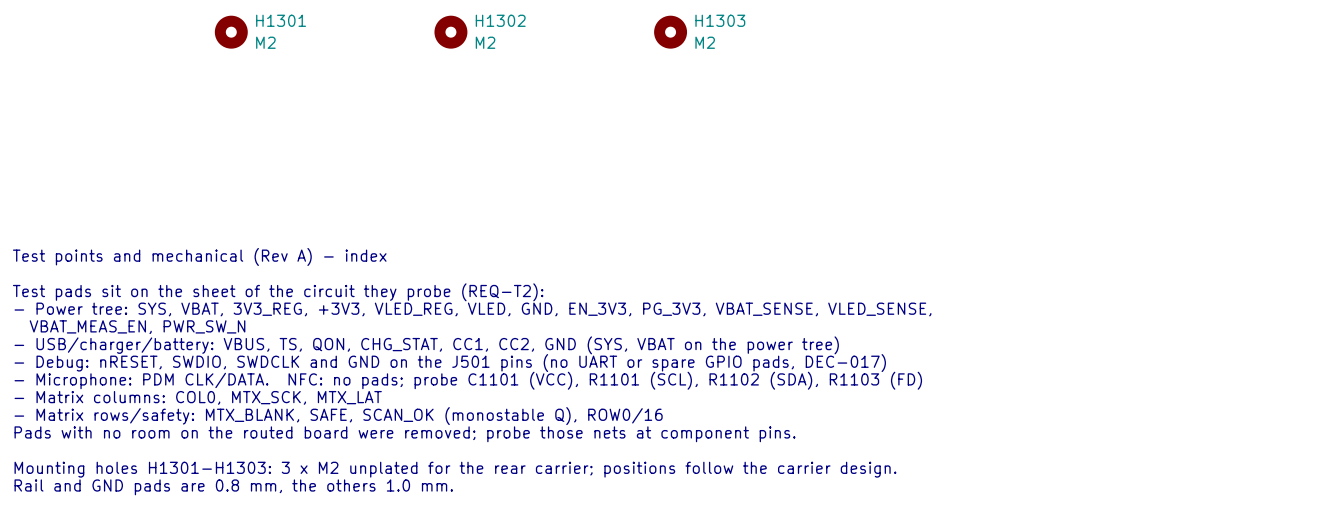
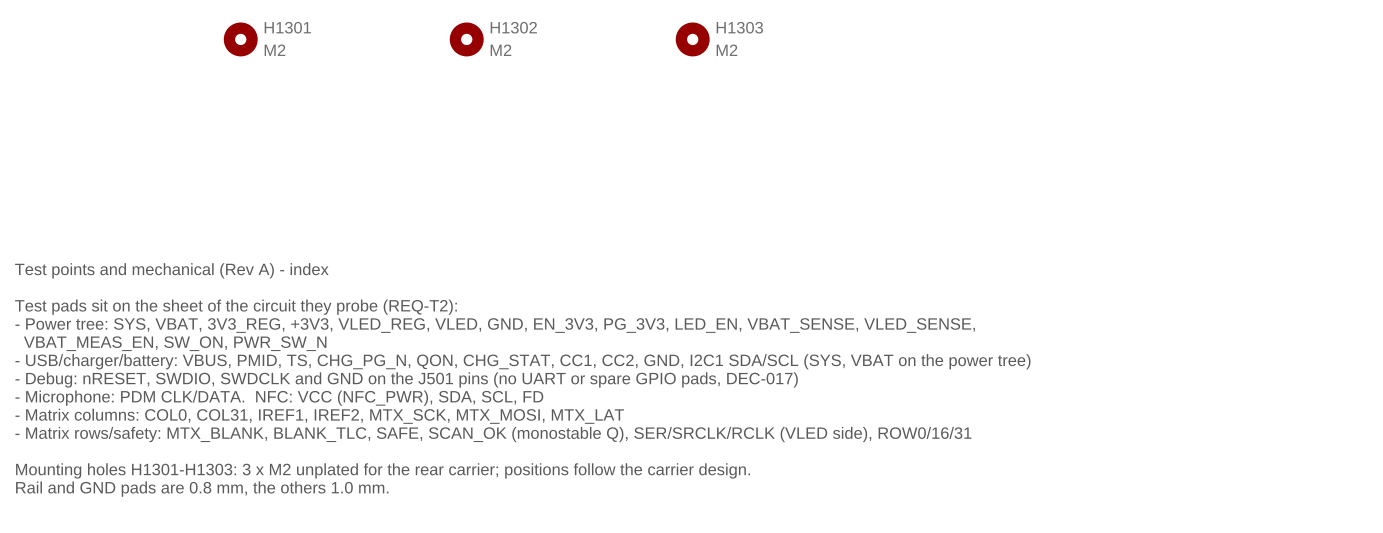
text: - Power tree: SYS, VBAT, 3V3_REG, +3V3, VLED_REG, VLED, GND, EN_3V3, PG_3V3, VBAT_SENSE, VLED_SENSE, (472, 309) -> - Power tree: SYS, VBAT, 3V3_REG, +3V3, VLED_REG, VLED, GND, EN_3V3, PG_3V3, LED_EN, VBAT_SENSE, VLED_SENSE, (495, 325)
text: VBAT_MEAS_EN, PWR_SW_N (137, 327) -> VBAT_MEAS_EN, SW_ON, PWR_SW_N (175, 343)
text: - USB/charger/battery: VBUS, TS, QON, CHG_STAT, CC1, CC2, GND (SYS, VBAT on the power tree) (426, 345) -> - USB/charger/battery: VBUS, PMID, TS, CHG_PG_N, QON, CHG_STAT, CC1, CC2, GND, I2C1 SDA/SCL (SYS, VBAT on the power tree) (522, 361)
text: - Microphone: PDM CLK/DATA. NFC: no pads; probe C1101 (VCC), R1101 (SCL), R1102 (SDA), R1103 (FD) (468, 380) -> - Microphone: PDM CLK/DATA. NFC: VCC (NFC_PWR), SDA, SCL, FD (279, 398)
text: - Matrix columns: COL0, MTX_SCK, MTX_LAT (198, 397) -> - Matrix columns: COL0, COL31, IREF1, IREF2, MTX_SCK, MTX_MOSI, MTX_LAT (319, 416)
text: - Matrix rows/safety: MTX_BLANK, SAFE, SCAN_OK (monostable Q), ROW0/16 (338, 416) -> - Matrix rows/safety: MTX_BLANK, BLANK_TLC, SAFE, SCAN_OK (monostable Q), SER/SRCLK/RCLK (VLED side), ROW0/16/31 (493, 434)
text: Pads with no room on the routed board were removed; probe those nets at component pins. (405, 434) -> none
text: none -> Mounting holes H1301-H1303: 3 x M2 unplated for the rear carrier; positions follow the carrier design. (383, 470)
text: Mounting holes H1301-H1303: 3 x M2 unplated for the rear carrier; positions follow the carrier design. (455, 469) -> Rail and GND pads are 0.8 mm, the others 1.0 mm. (202, 489)
text: Rail and GND pads are 0.8 mm, the others 1.0 mm. (233, 487) -> none

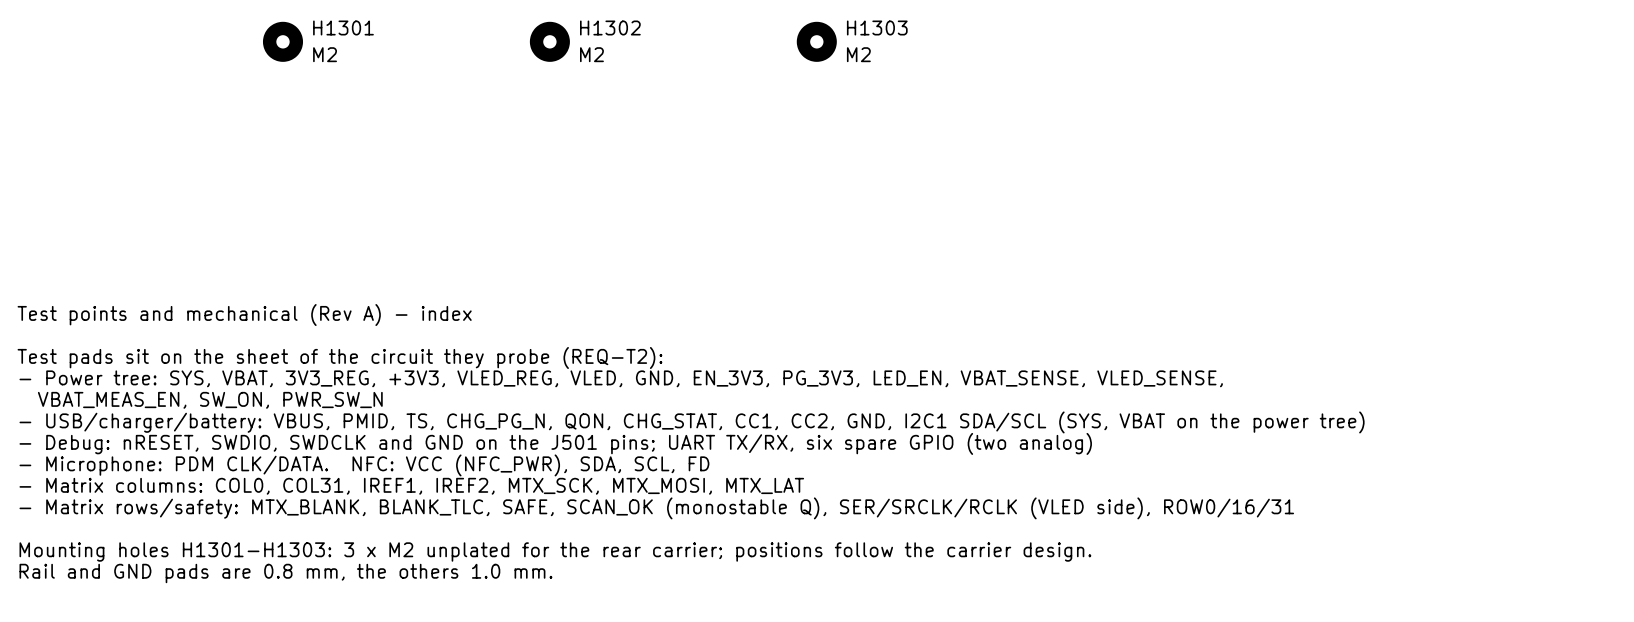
text: - Debug: nRESET, SWDIO, SWDCLK and GND on the J501 pins (no UART or spare GPIO pads, DEC-017) (406, 379) -> - Debug: nRESET, SWDIO, SWDCLK and GND on the J501 pins; UART TX/RX, six spare GPIO (two analog) (555, 443)

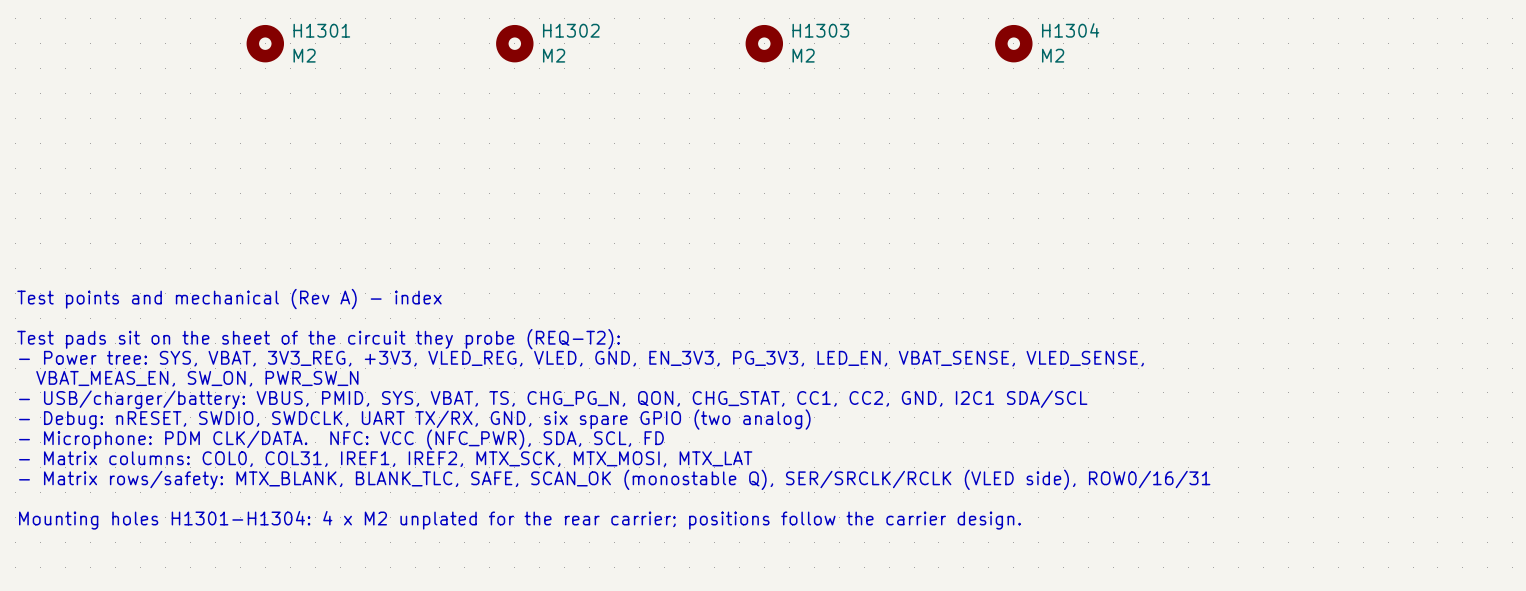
H1304: none -> M2 (1013, 43)
text: - USB/charger/battery: VBUS, PMID, TS, CHG_PG_N, QON, CHG_STAT, CC1, CC2, GND, I2C1 SDA/SCL (SYS, VBAT on the power tree) (692, 422) -> - USB/charger/battery: VBUS, PMID, SYS, VBAT, TS, CHG_PG_N, QON, CHG_STAT, CC1, CC2, GND, I2C1 SDA/SCL (553, 399)
text: - Debug: nRESET, SWDIO, SWDCLK and GND on the J501 pins; UART TX/RX, six spare GPIO (two analog) (555, 443) -> - Debug: nRESET, SWDIO, SWDCLK, UART TX/RX, GND, six spare GPIO (two analog) (414, 419)
text: Mounting holes H1301-H1303: 3 x M2 unplated for the rear carrier; positions follow the carrier design. (555, 552) -> Mounting holes H1301-H1304: 4 x M2 unplated for the rear carrier; positions follow the carrier design. (519, 520)
text: Rail and GND pads are 0.8 mm, the others 1.0 mm. (285, 573) -> none

